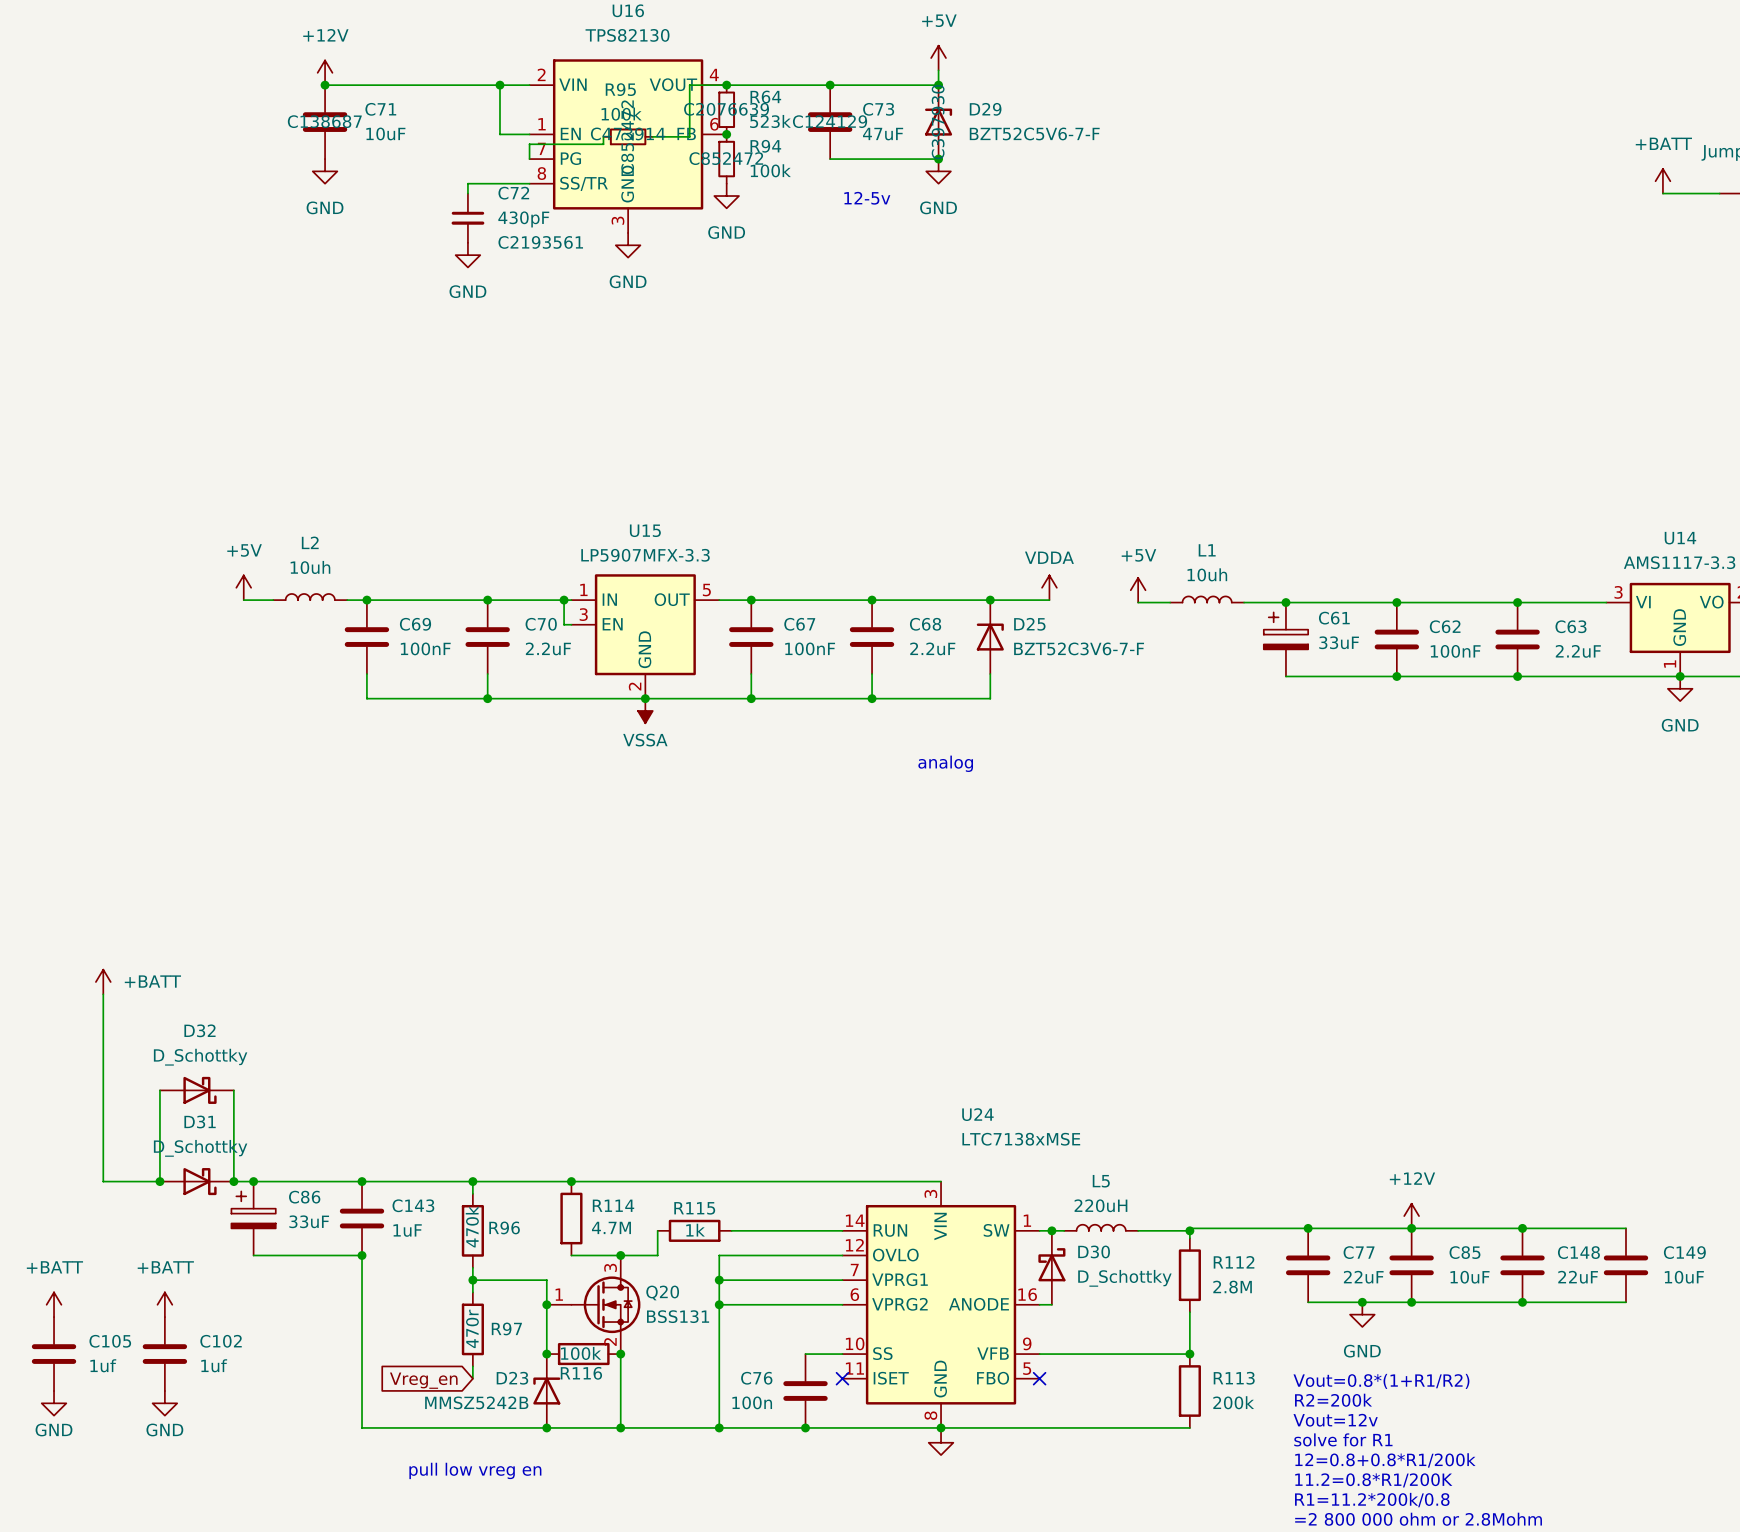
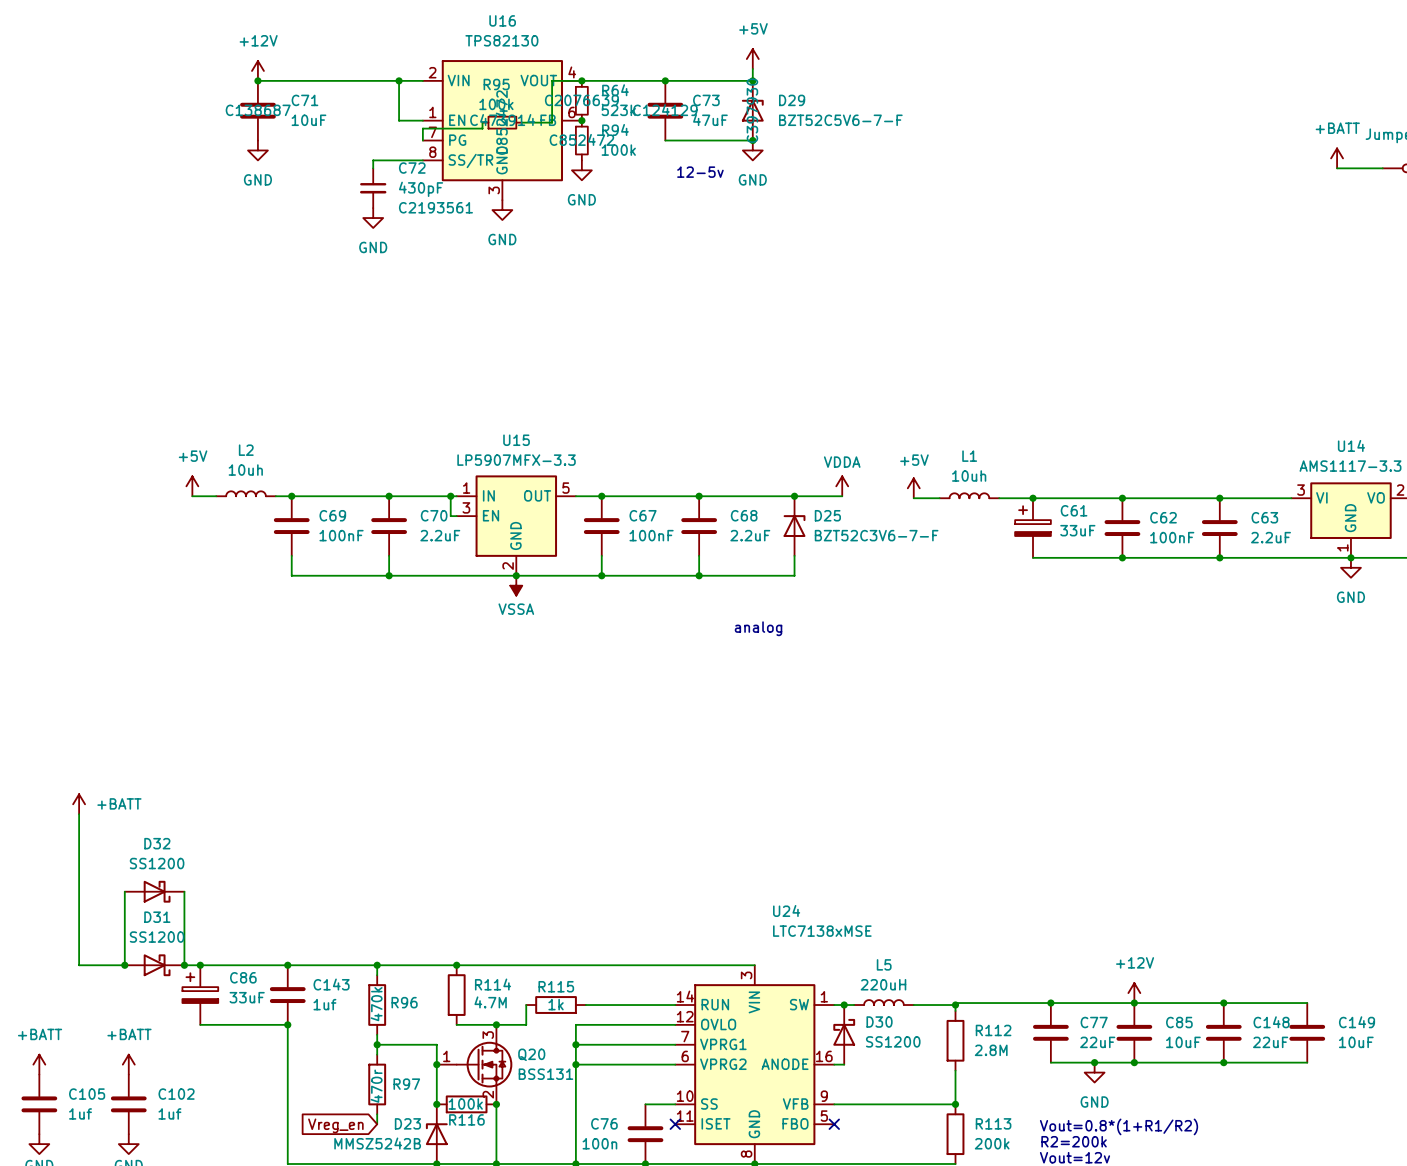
D32 value: D_Schottky (200, 1057) -> SS1200 (157, 863)
D31 value: D_Schottky (200, 1148) -> SS1200 (157, 937)
C143 value: 1uF (407, 1230) -> 1uf (324, 1004)
D30 value: D_Schottky (1124, 1278) -> SS1200 (893, 1041)

